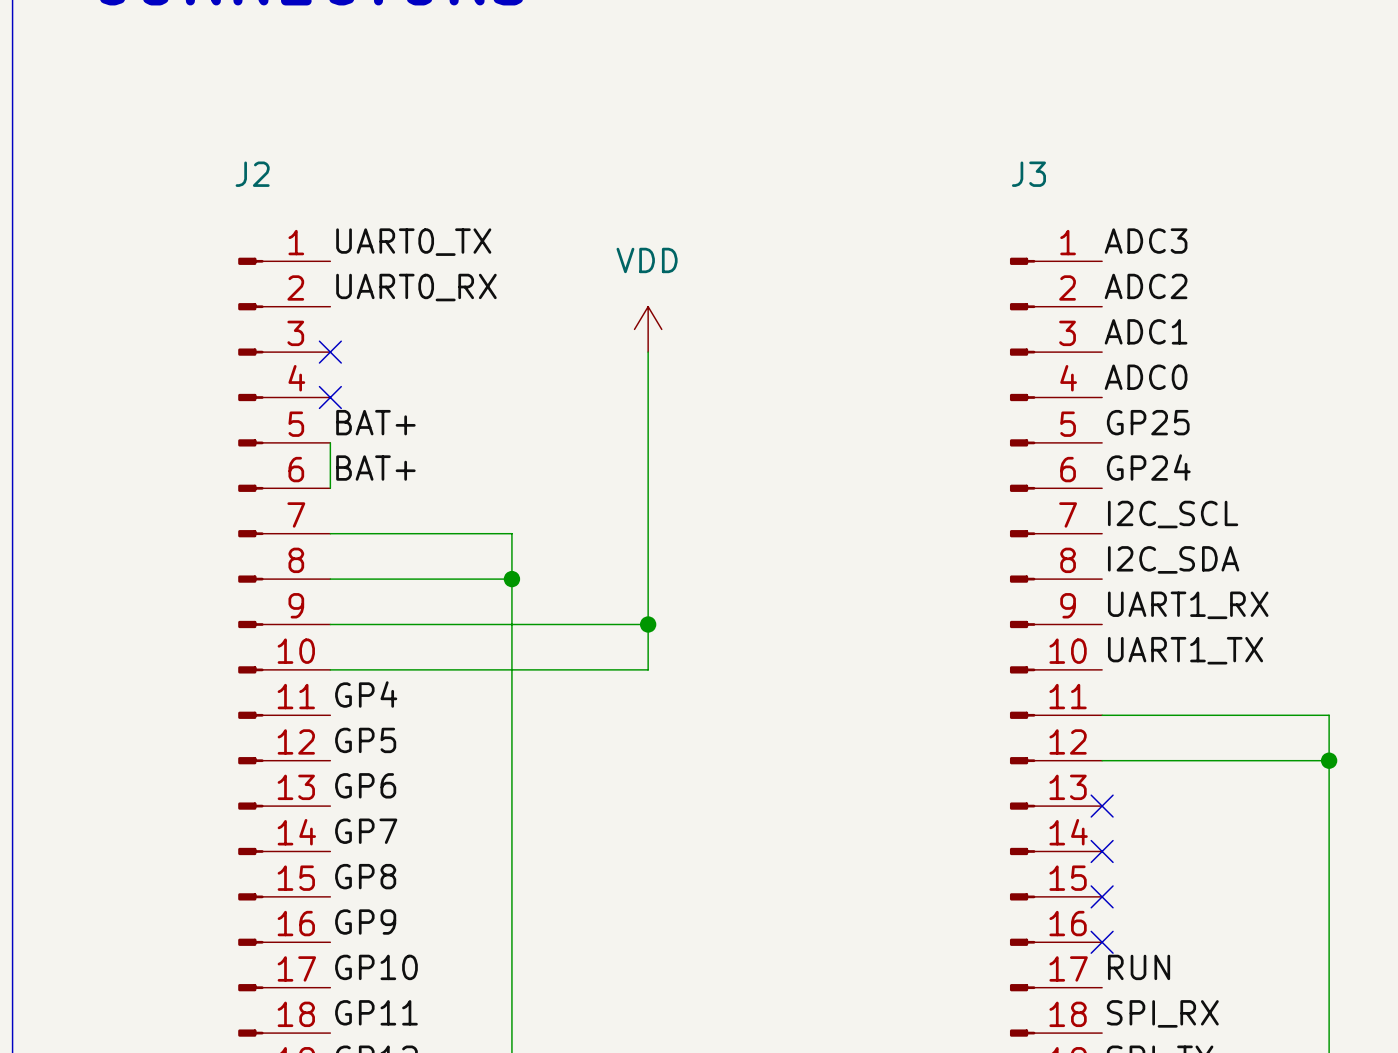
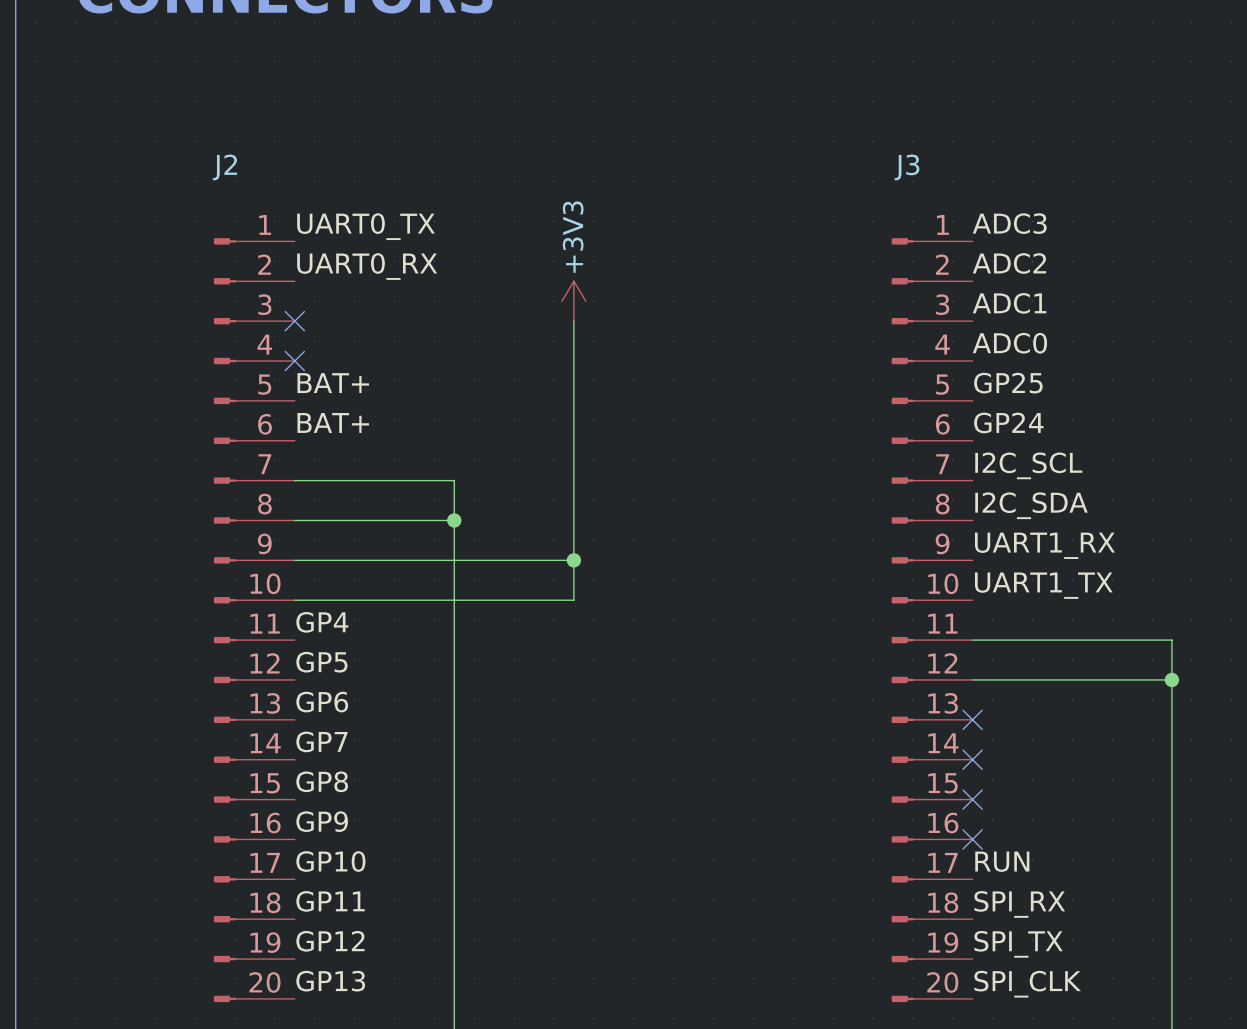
power symbol: VDD (648, 329) -> +3V3 (573, 301)
wire: (330, 442) (330, 488) -> none

